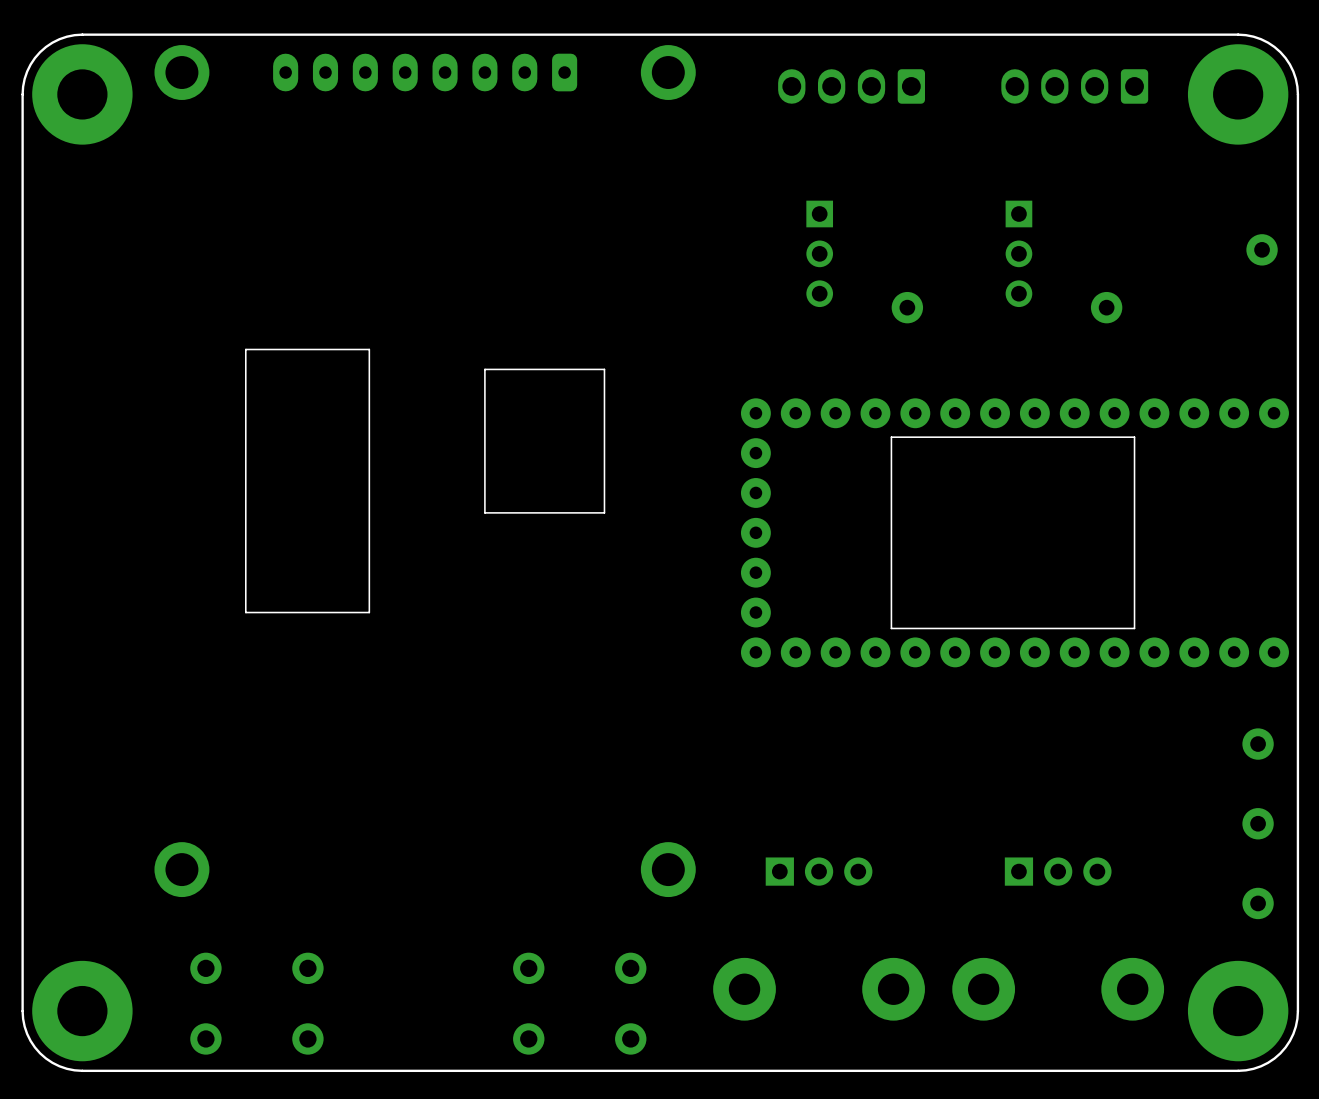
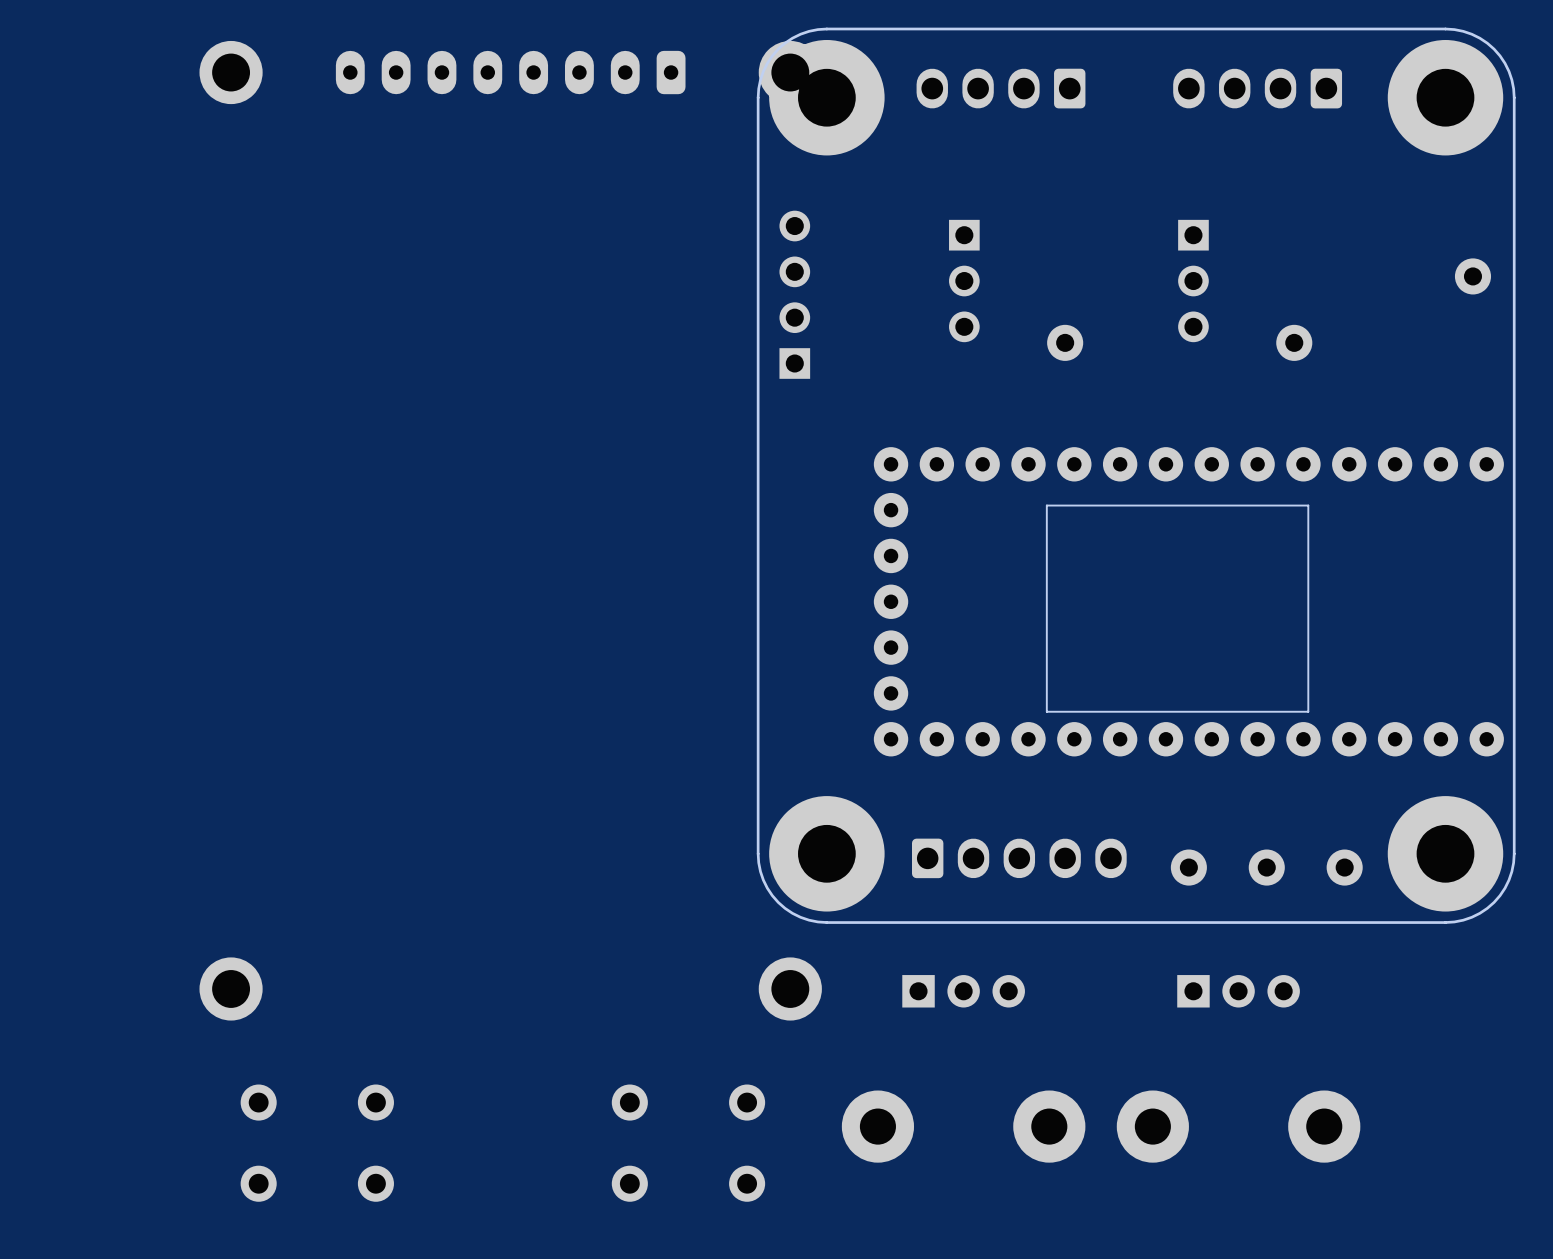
board edge: (700, 34) (82, 34) (66, 36) (52, 42) (40, 52) (30, 64) (24, 78) (22, 94) (22, 1011) (24, 1026) (34, 1047) (46, 1058) (59, 1066) (82, 1070) (1238, 1070) (1253, 1068) (1268, 1062) (1285, 1047) (1293, 1033) (1297, 1018) (1297, 752) -> (826, 28) (800, 34) (778, 49) (763, 71) (758, 97) (758, 853) (760, 871) (772, 895) (792, 913) (809, 920) (826, 922) (1445, 922) (1471, 917) (1494, 902) (1508, 880) (1514, 853)
part: (82, 94) -> none
part: none -> (826, 97)
part: none -> (794, 294)
board edge: (369, 349) (369, 612) (245, 612) (245, 349) (369, 349) -> none
board edge: (604, 369) (604, 512) (484, 512) (484, 369) (604, 369) -> none
board edge: (891, 449) (891, 437) (1134, 437) (1134, 628) (1118, 628) -> (1046, 505) (1308, 505) (1308, 711)
part: (1258, 744) -> none
part: none -> (826, 853)
part: none -> (1019, 858)
part: none -> (1188, 867)
part: none -> (1266, 867)
part: none -> (1344, 867)
part: (1258, 823) -> none
part: (1258, 903) -> none
part: (82, 1011) -> none
part position: (1238, 1011) -> (1445, 853)

